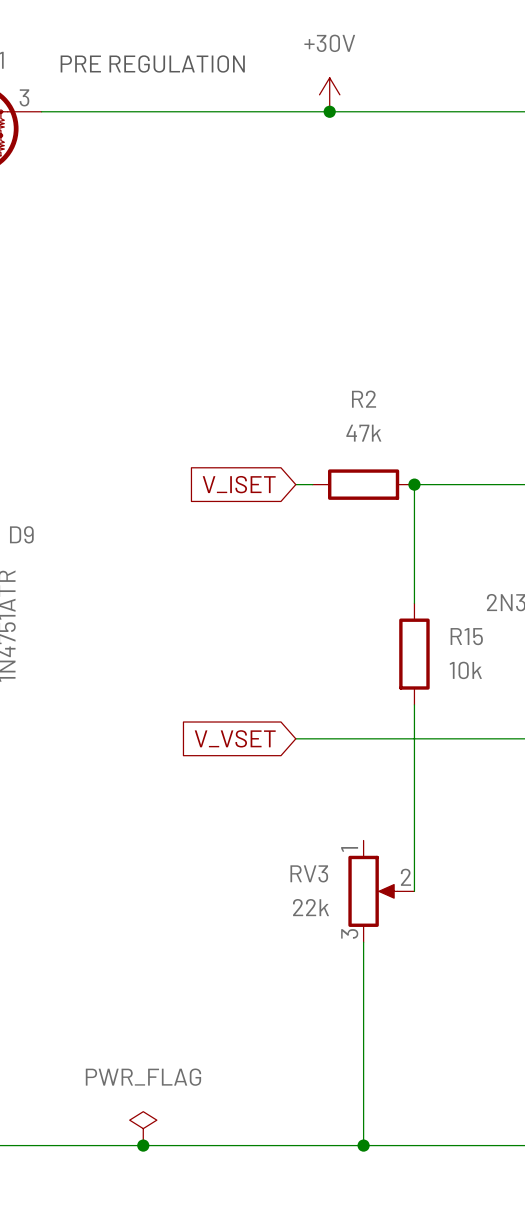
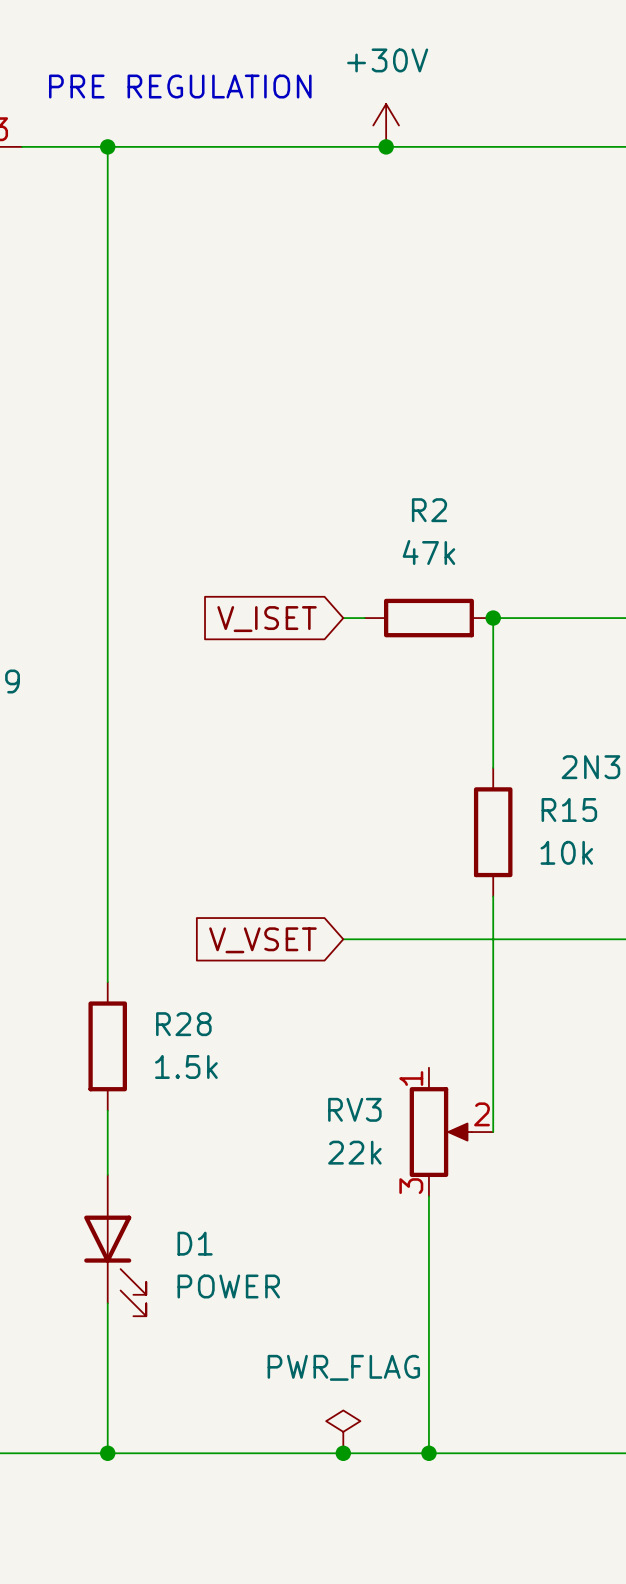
wire: none -> (107, 146) (107, 982)
junction: none -> (107, 146)
R28: none -> 1.5k (107, 1046)
wire: none -> (107, 1110) (107, 1174)
D1: none -> POWER (115, 1245)
wire: none -> (107, 1303) (107, 1453)
power symbol position: PWR_FLAG (143, 1128) -> PWR_FLAG (343, 1431)
junction position: (143, 1145) -> (107, 1453)
junction: none -> (343, 1453)

